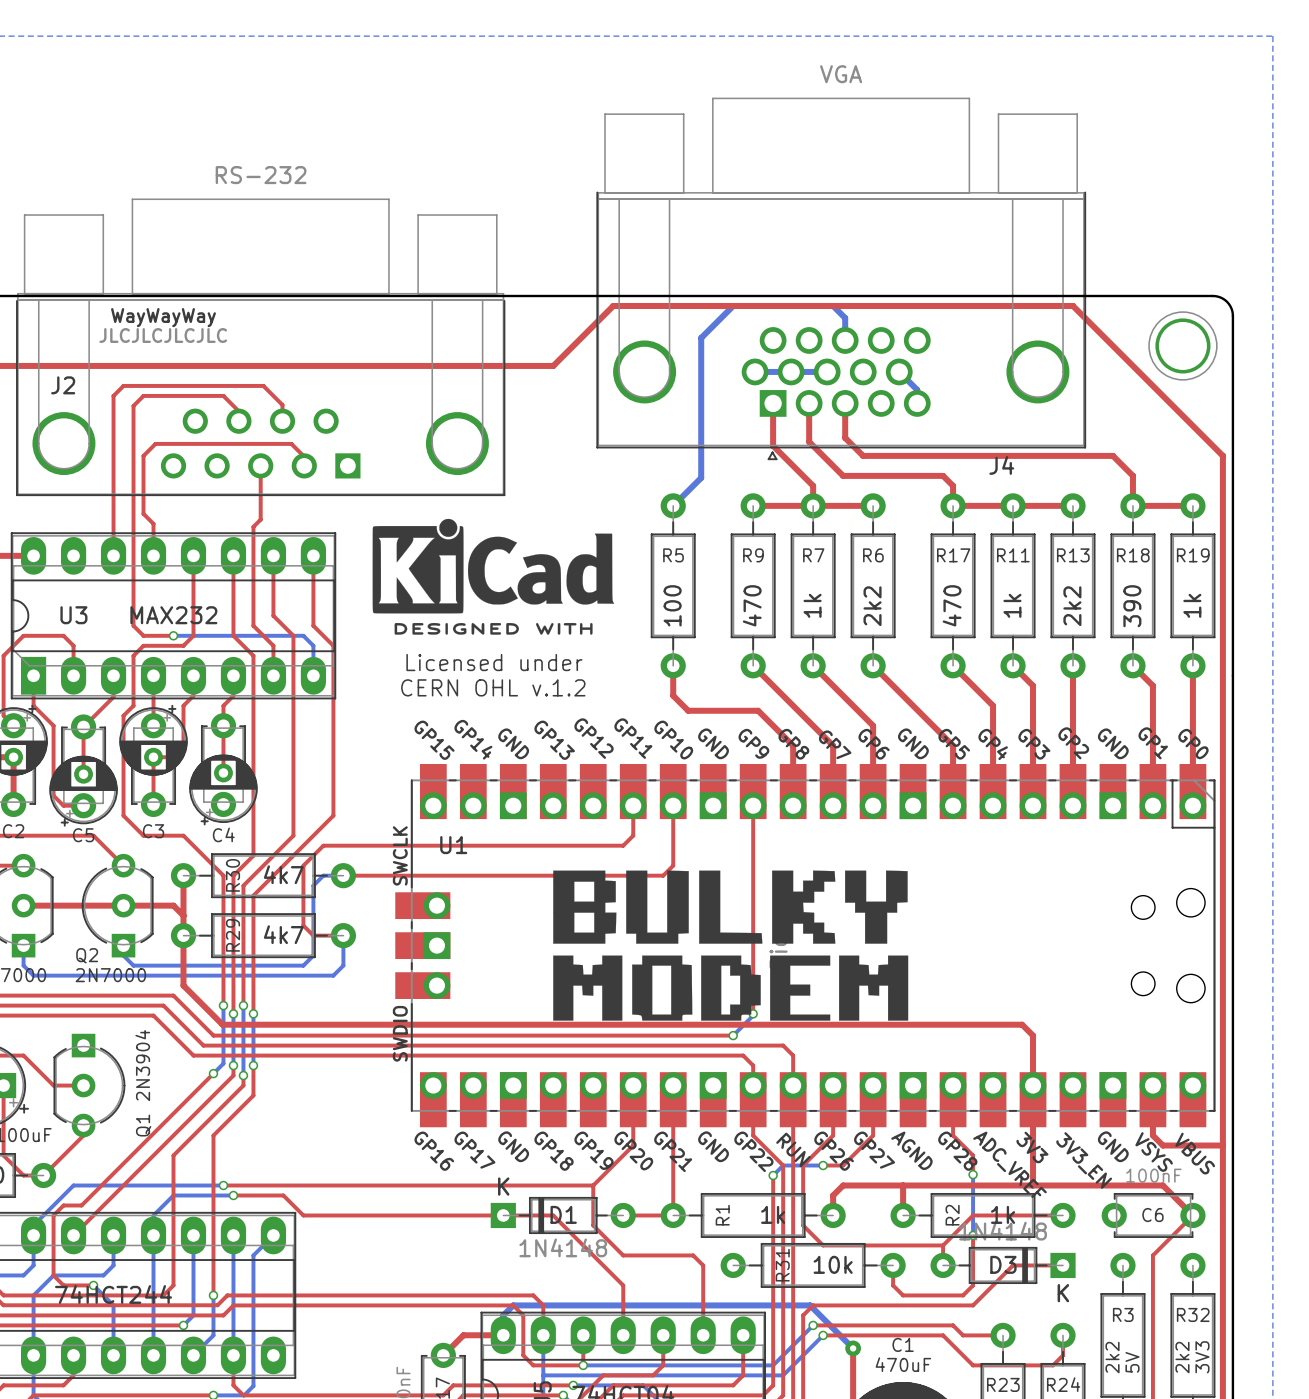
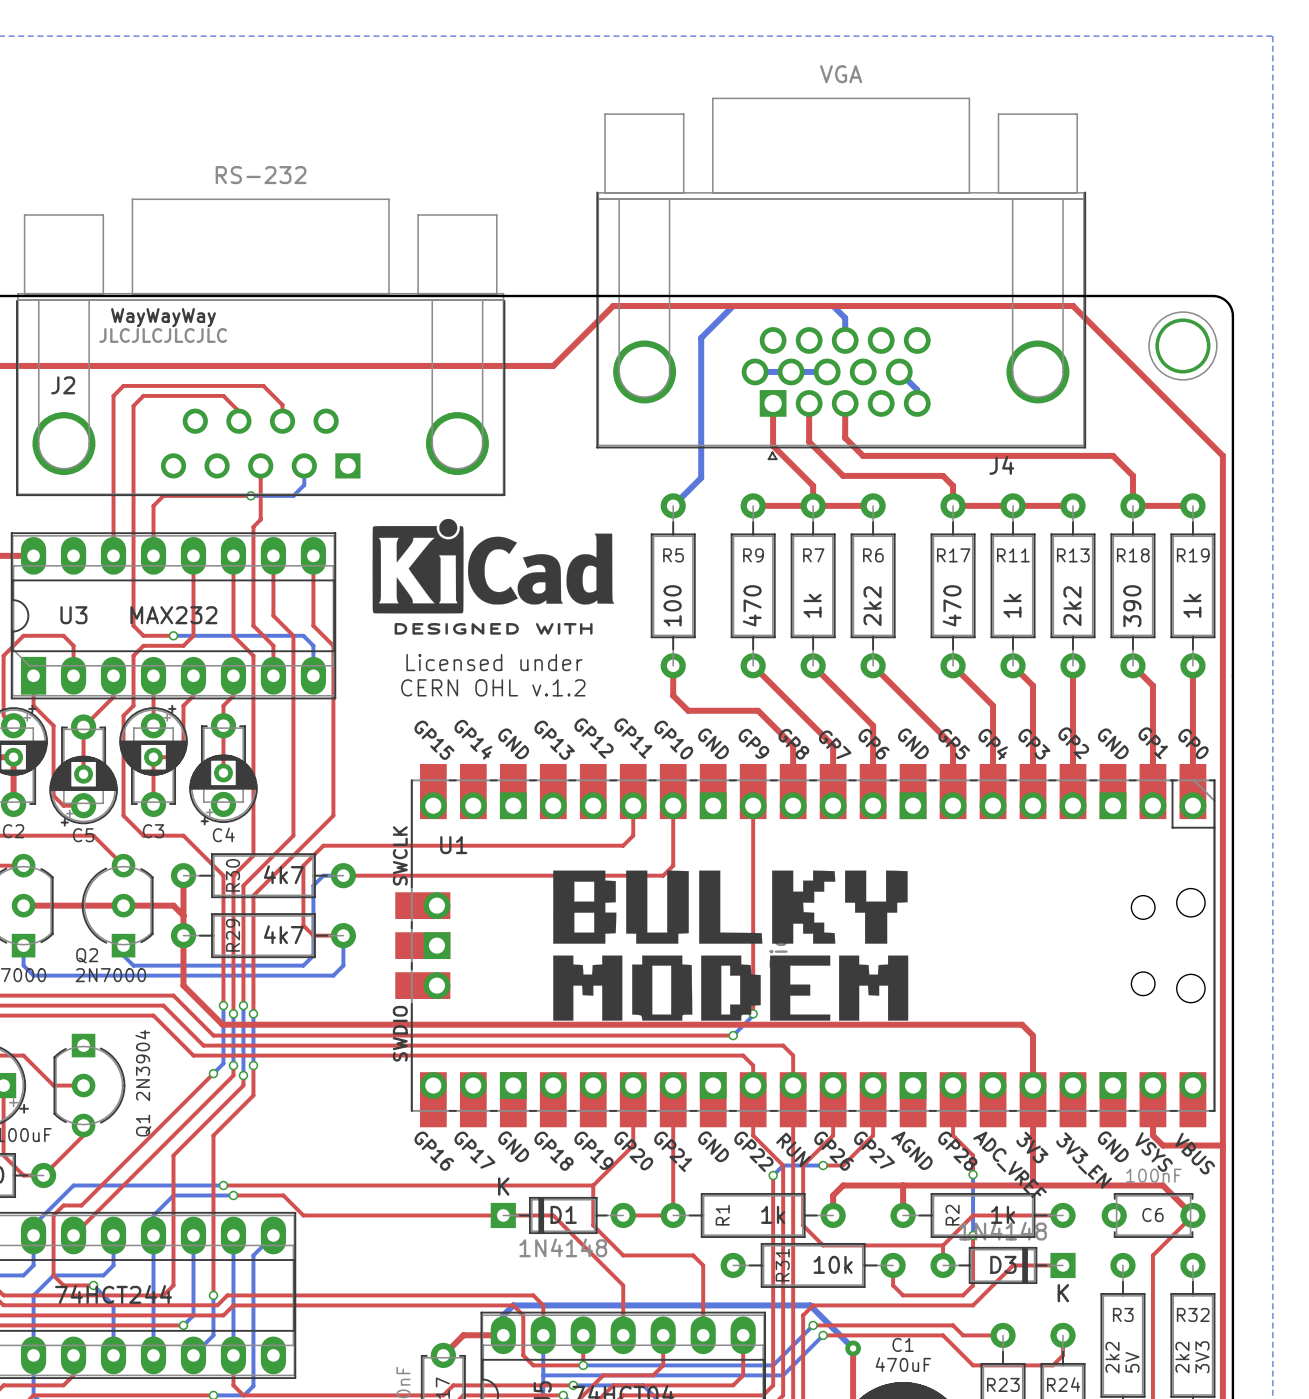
bottom track: none -> (304, 465) (304, 485) (293, 495) (250, 495)
top track: (304, 465) (304, 456) (291, 443) (155, 443) (143, 455) (143, 513) (153, 523) -> (250, 495) (163, 495) (153, 505) (153, 523)
via: none -> (250, 495)

